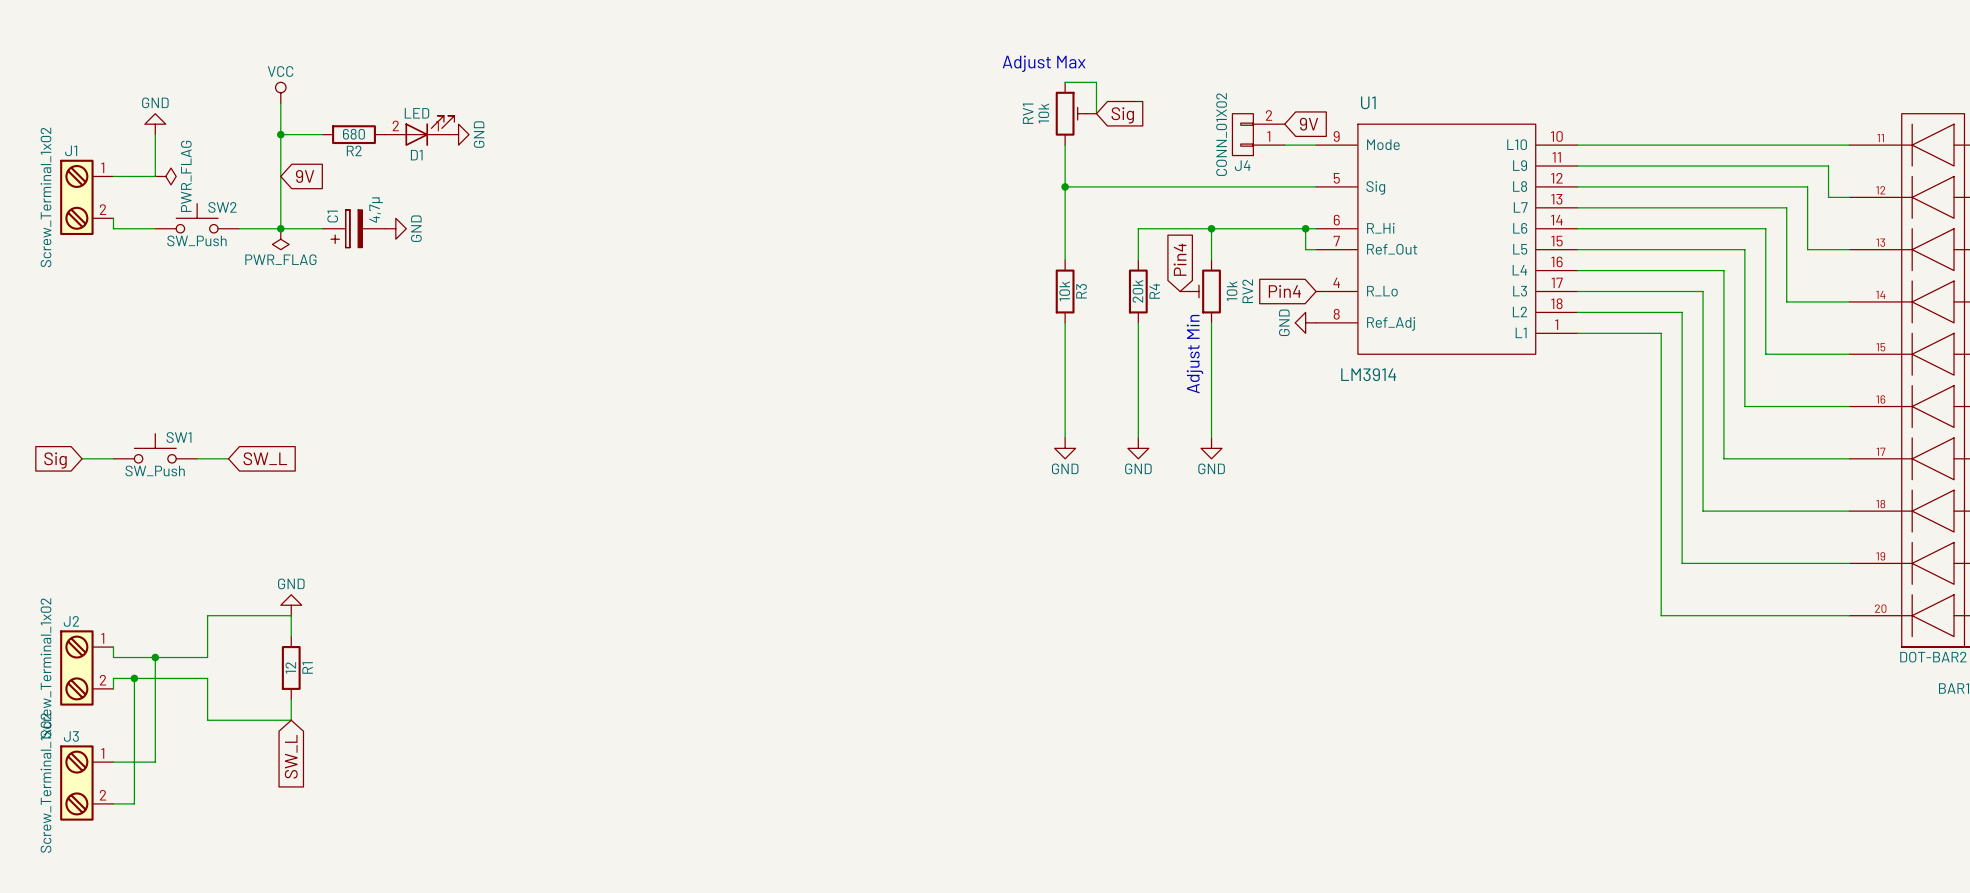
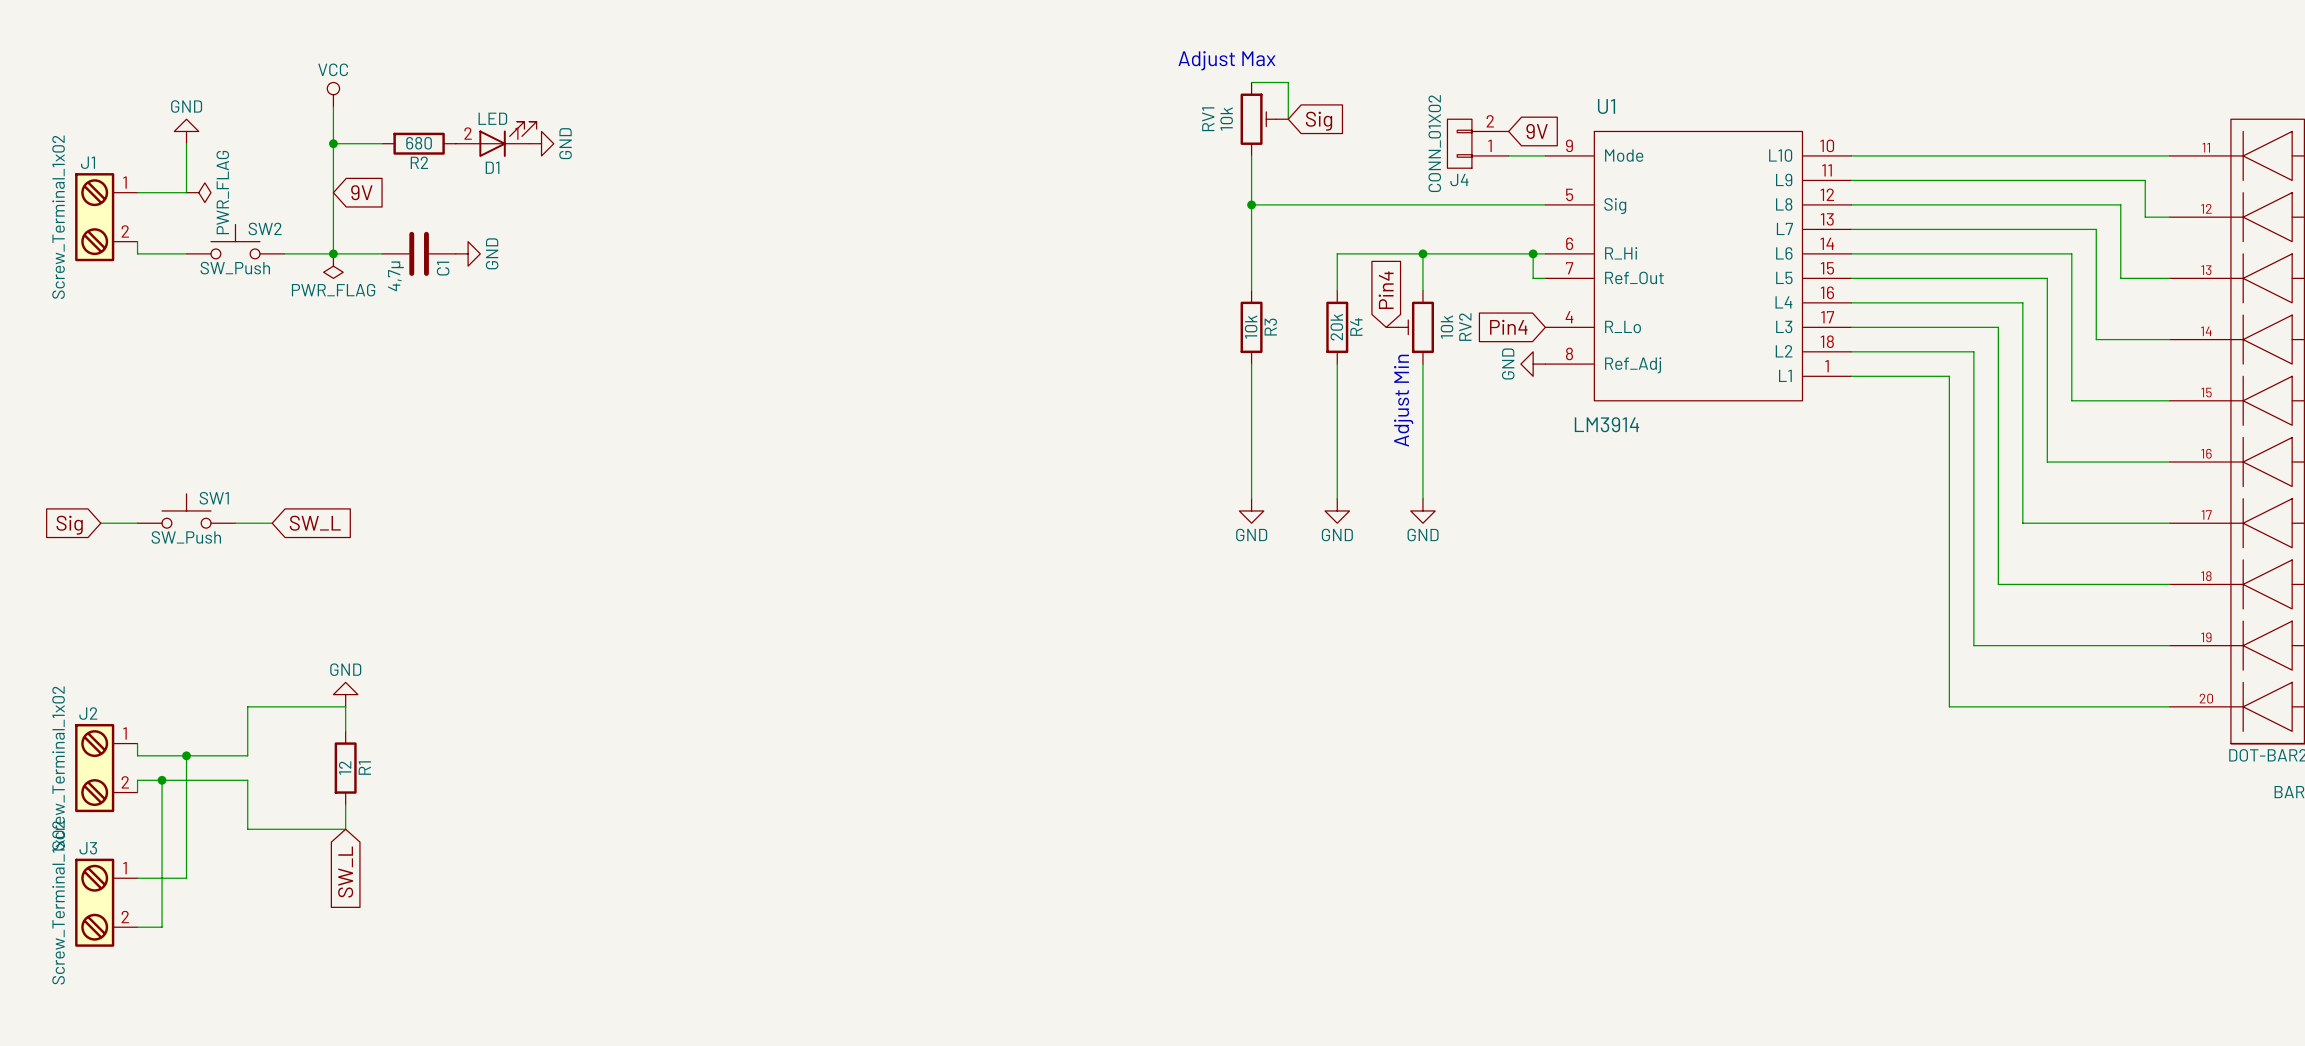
C1 symbol: [322, 209, 386, 248] -> [382, 231, 456, 276]
C1 value position: 4,7µ (376, 210) -> 4,7µ (395, 276)
C1 name position: C1 (332, 216) -> C1 (443, 268)

